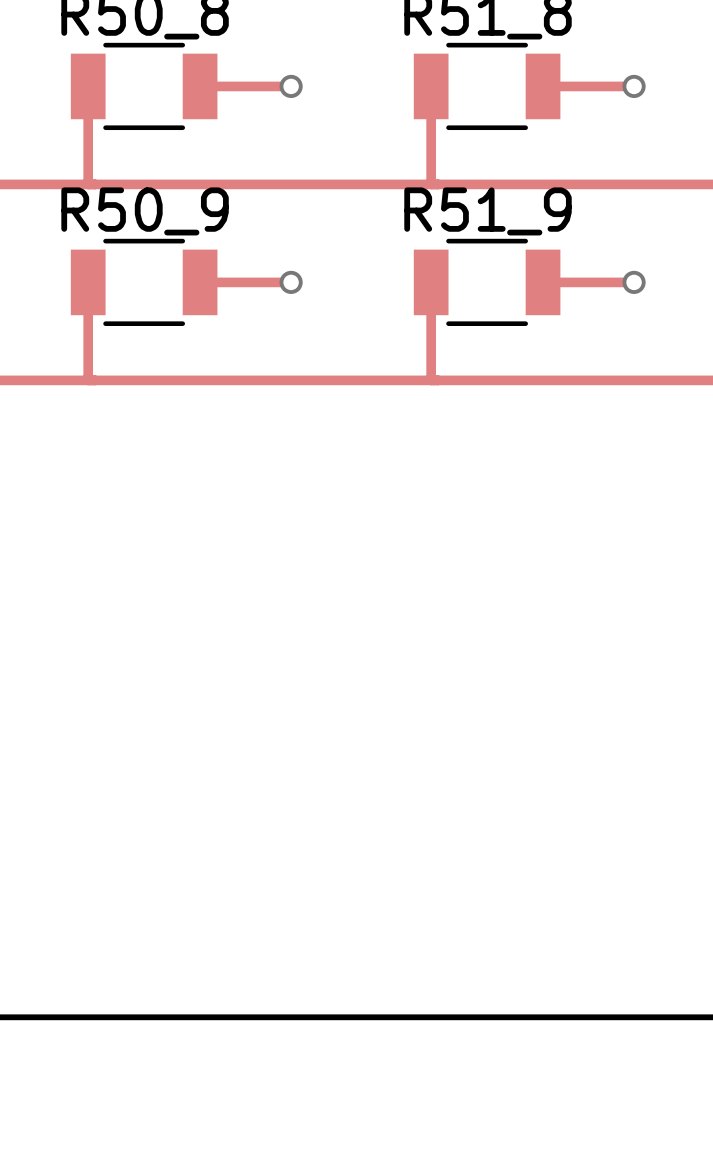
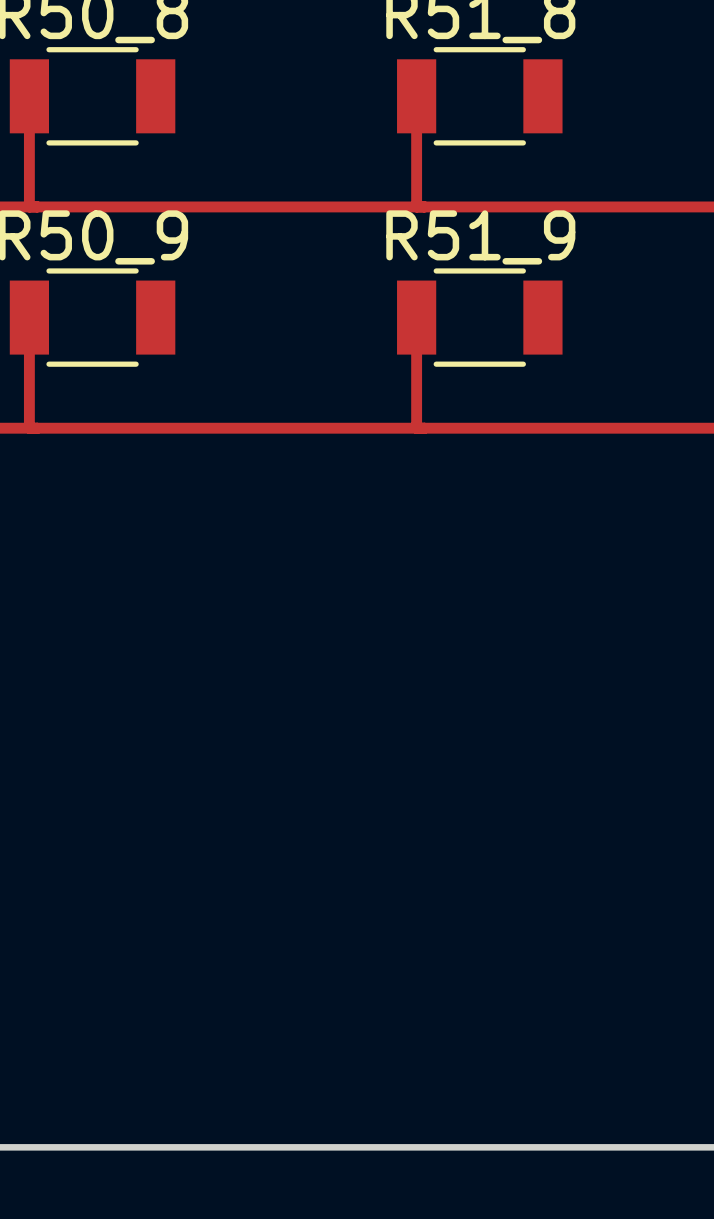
track: (200, 86) (291, 86) -> none
via: (291, 86) -> none
track: (543, 86) (634, 86) -> none
via: (634, 86) -> none
track: (200, 282) (291, 282) -> none
via: (291, 282) -> none
track: (543, 282) (634, 282) -> none
via: (634, 282) -> none

